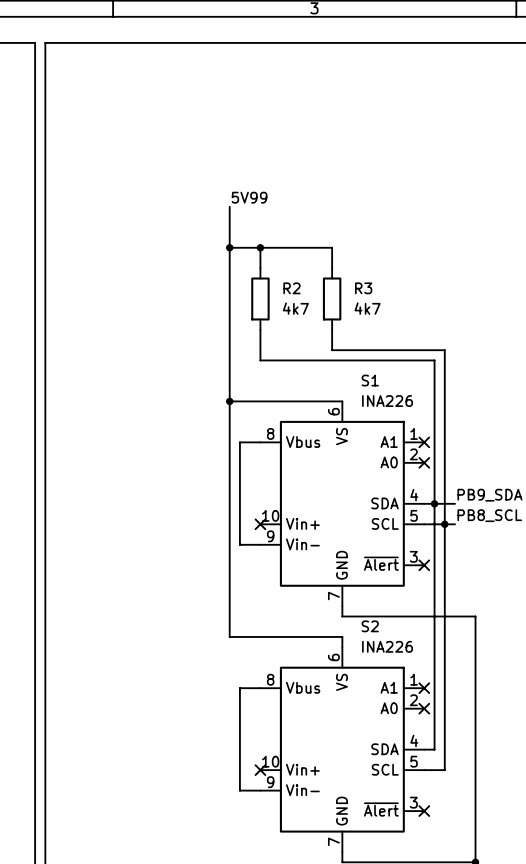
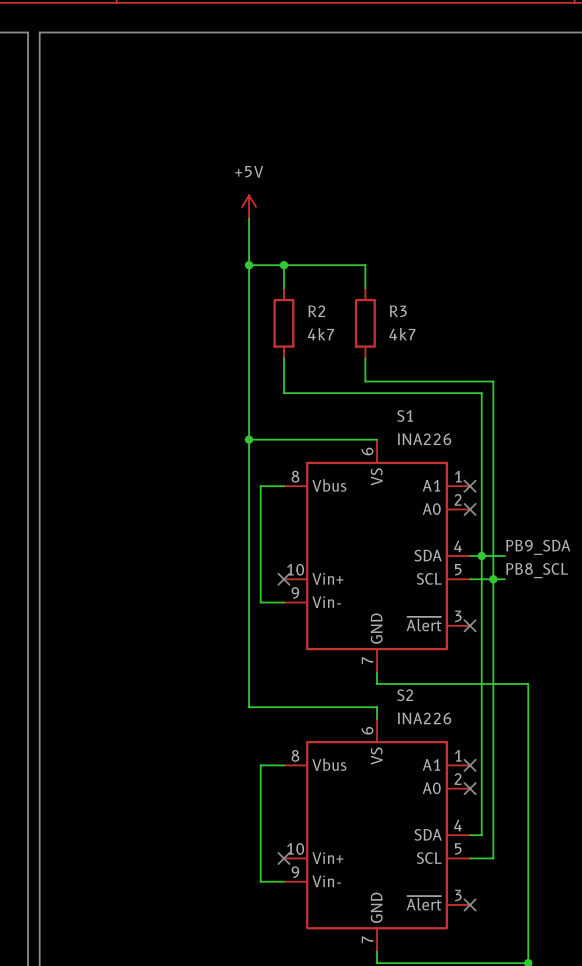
power symbol: none -> +5V (249, 207)
label: 5V99 (249, 197) -> none

